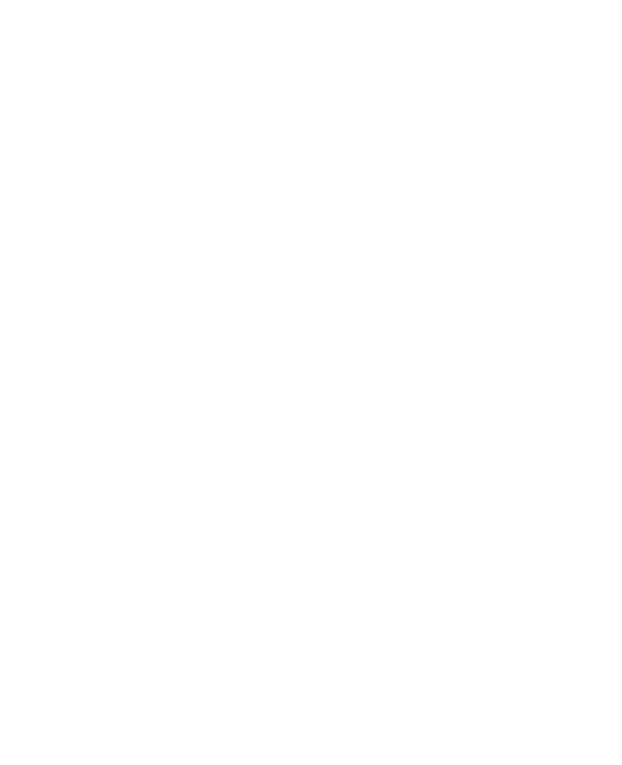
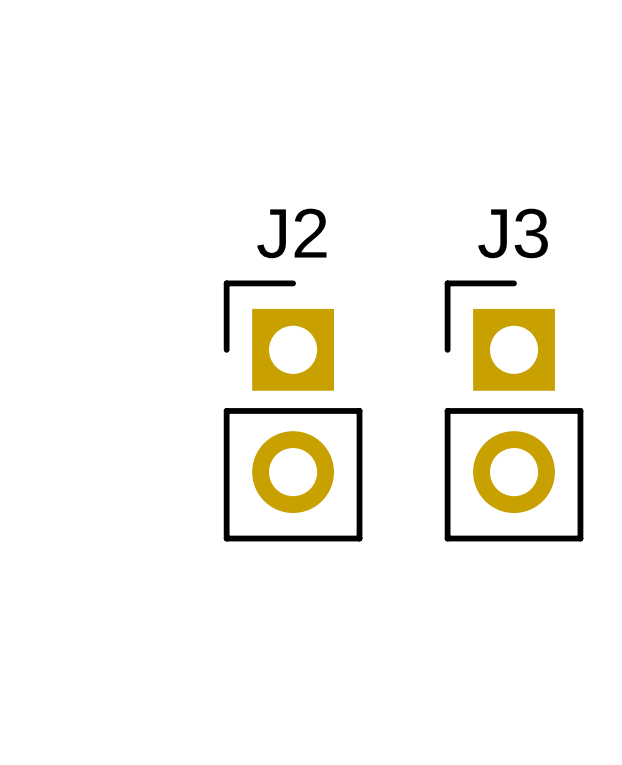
J2: none -> (293, 410)
J3: none -> (514, 410)

